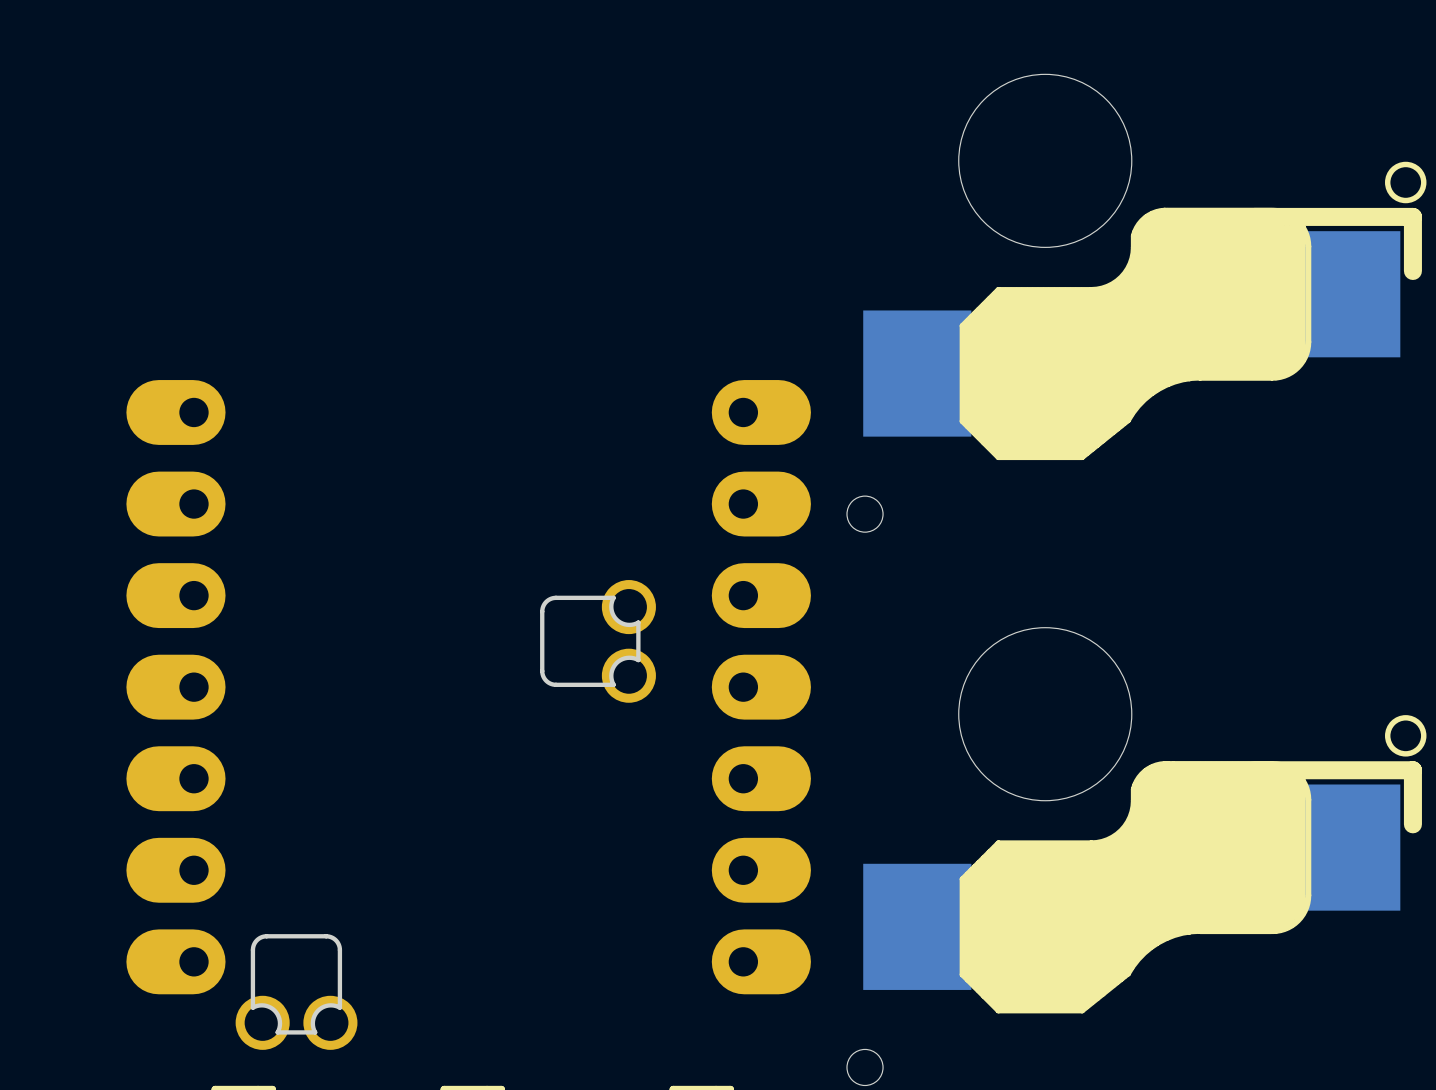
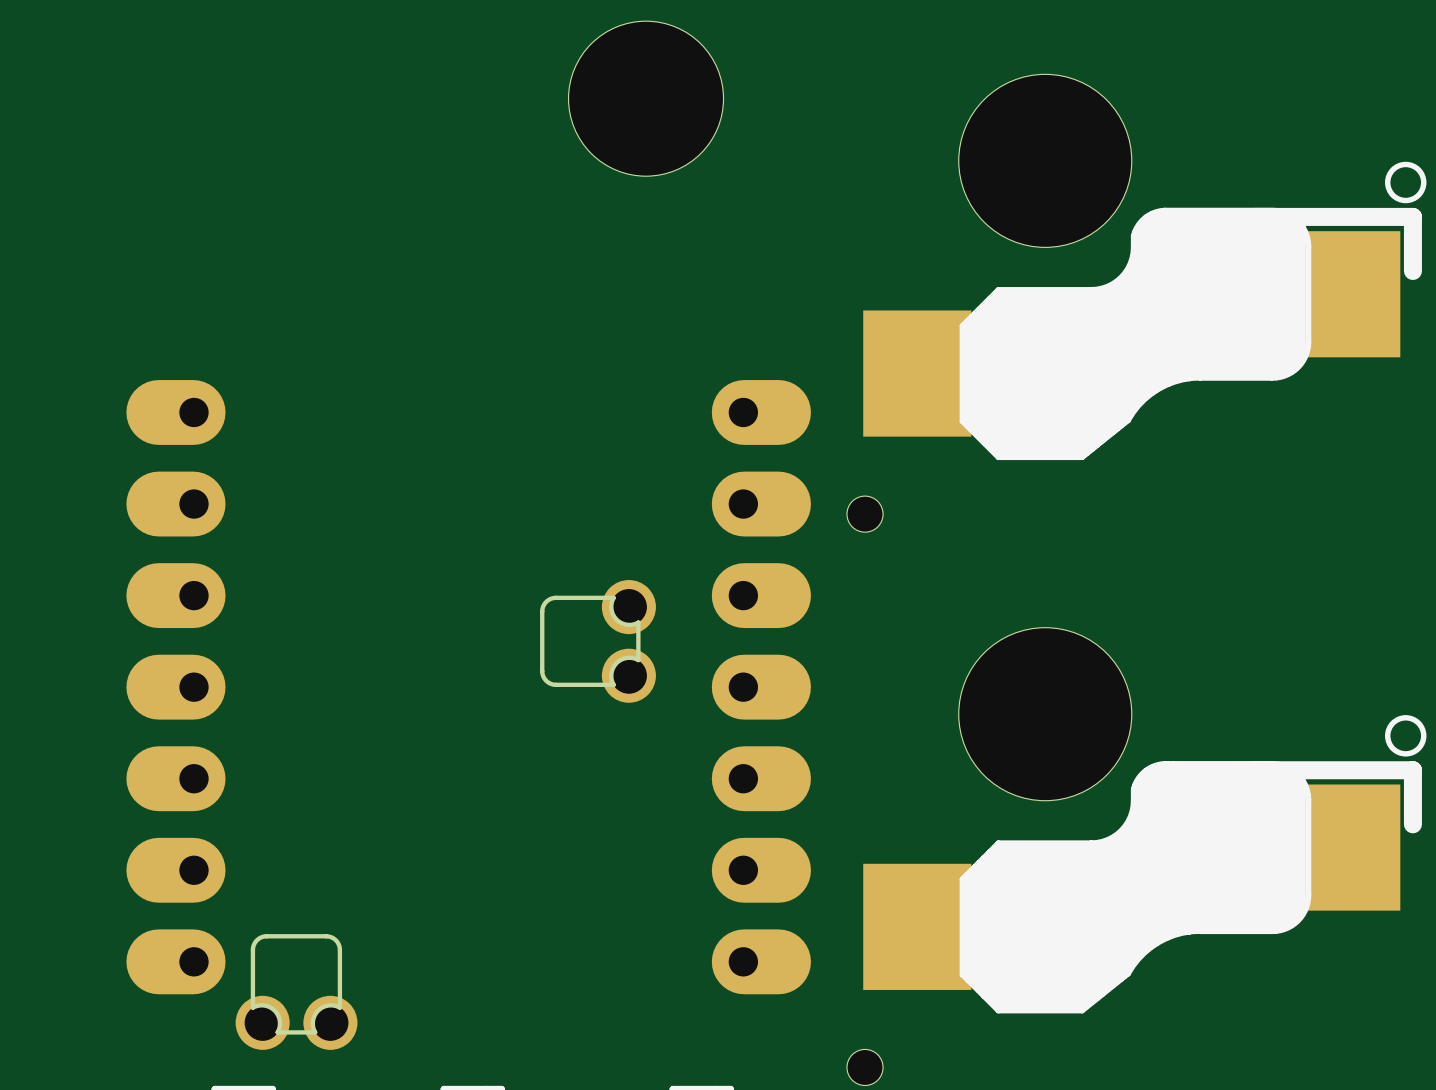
part: none -> (646, 98)

